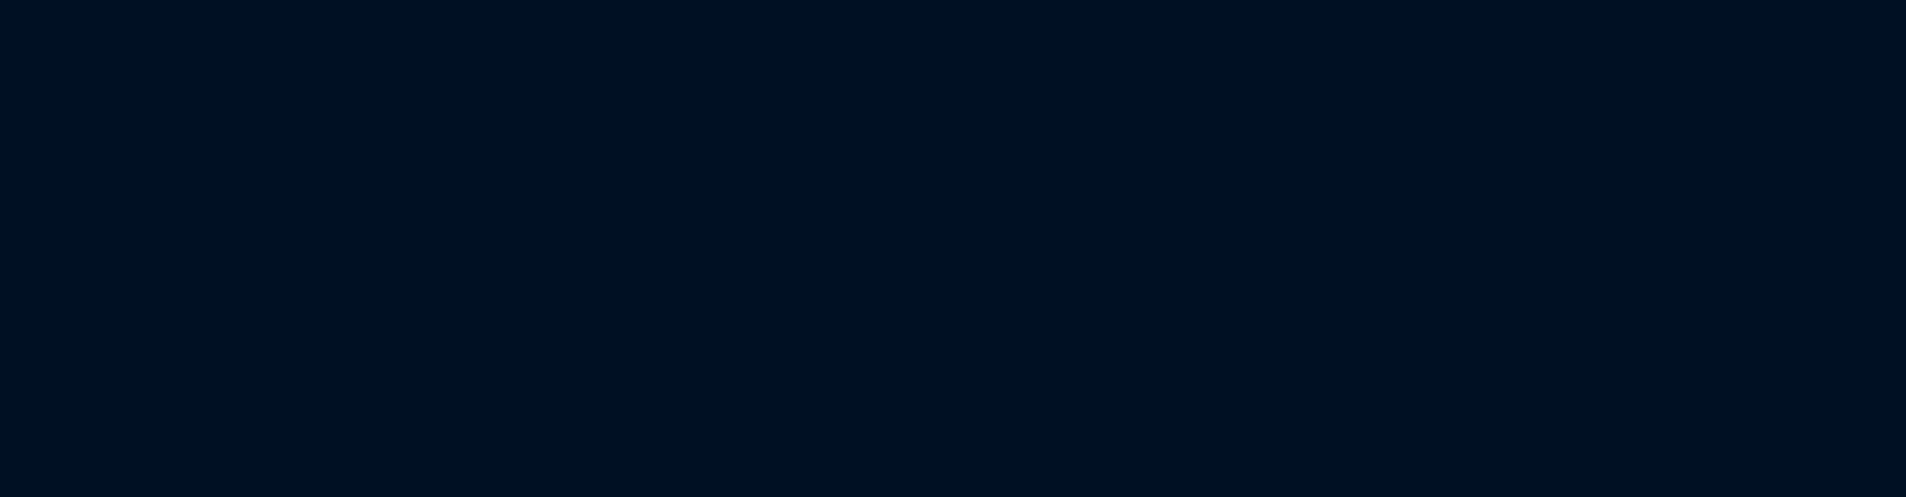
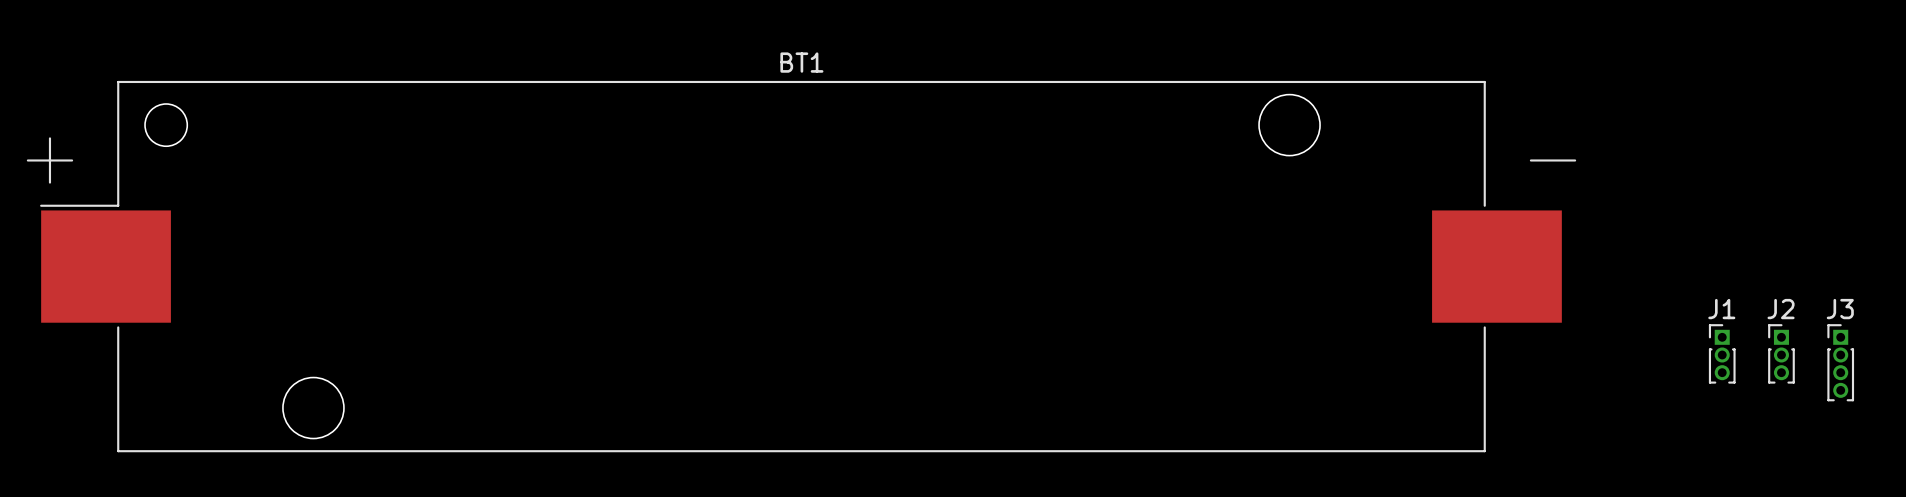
BT1: none -> (801, 266)
J1: none -> (1722, 353)
J2: none -> (1781, 353)
J3: none -> (1840, 362)

